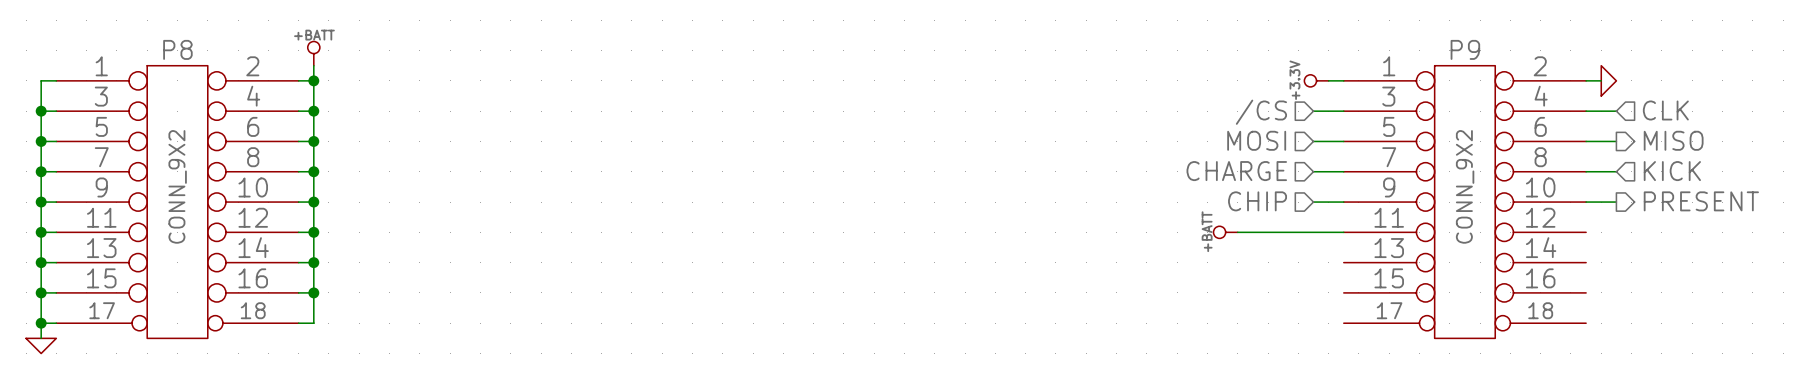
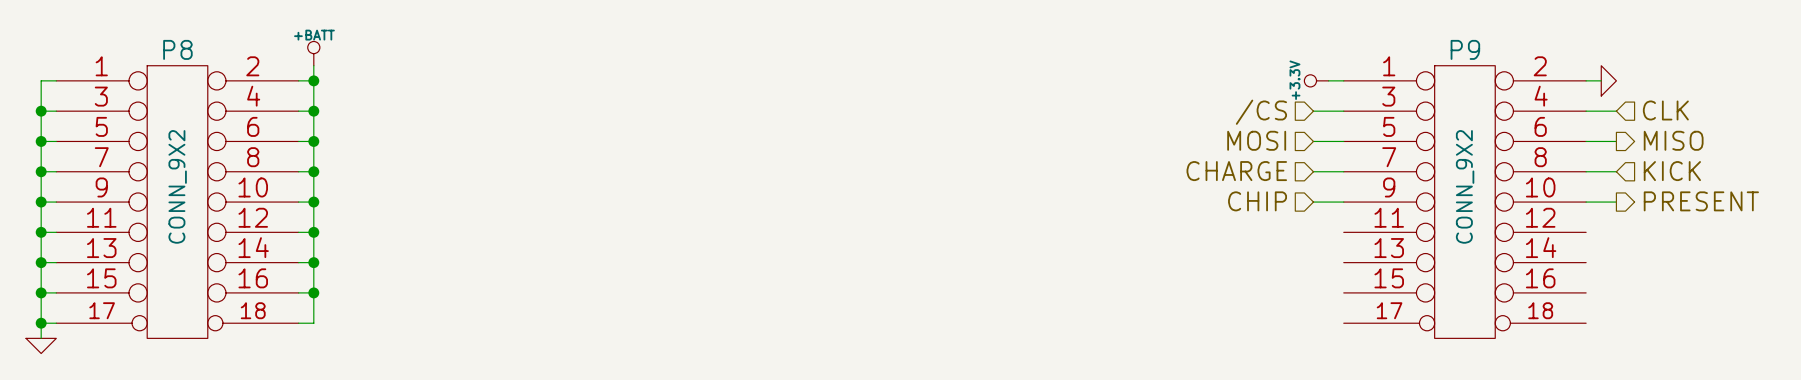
power symbol: +BATT (1225, 232) -> none
wire: (1237, 232) (1343, 232) -> none

